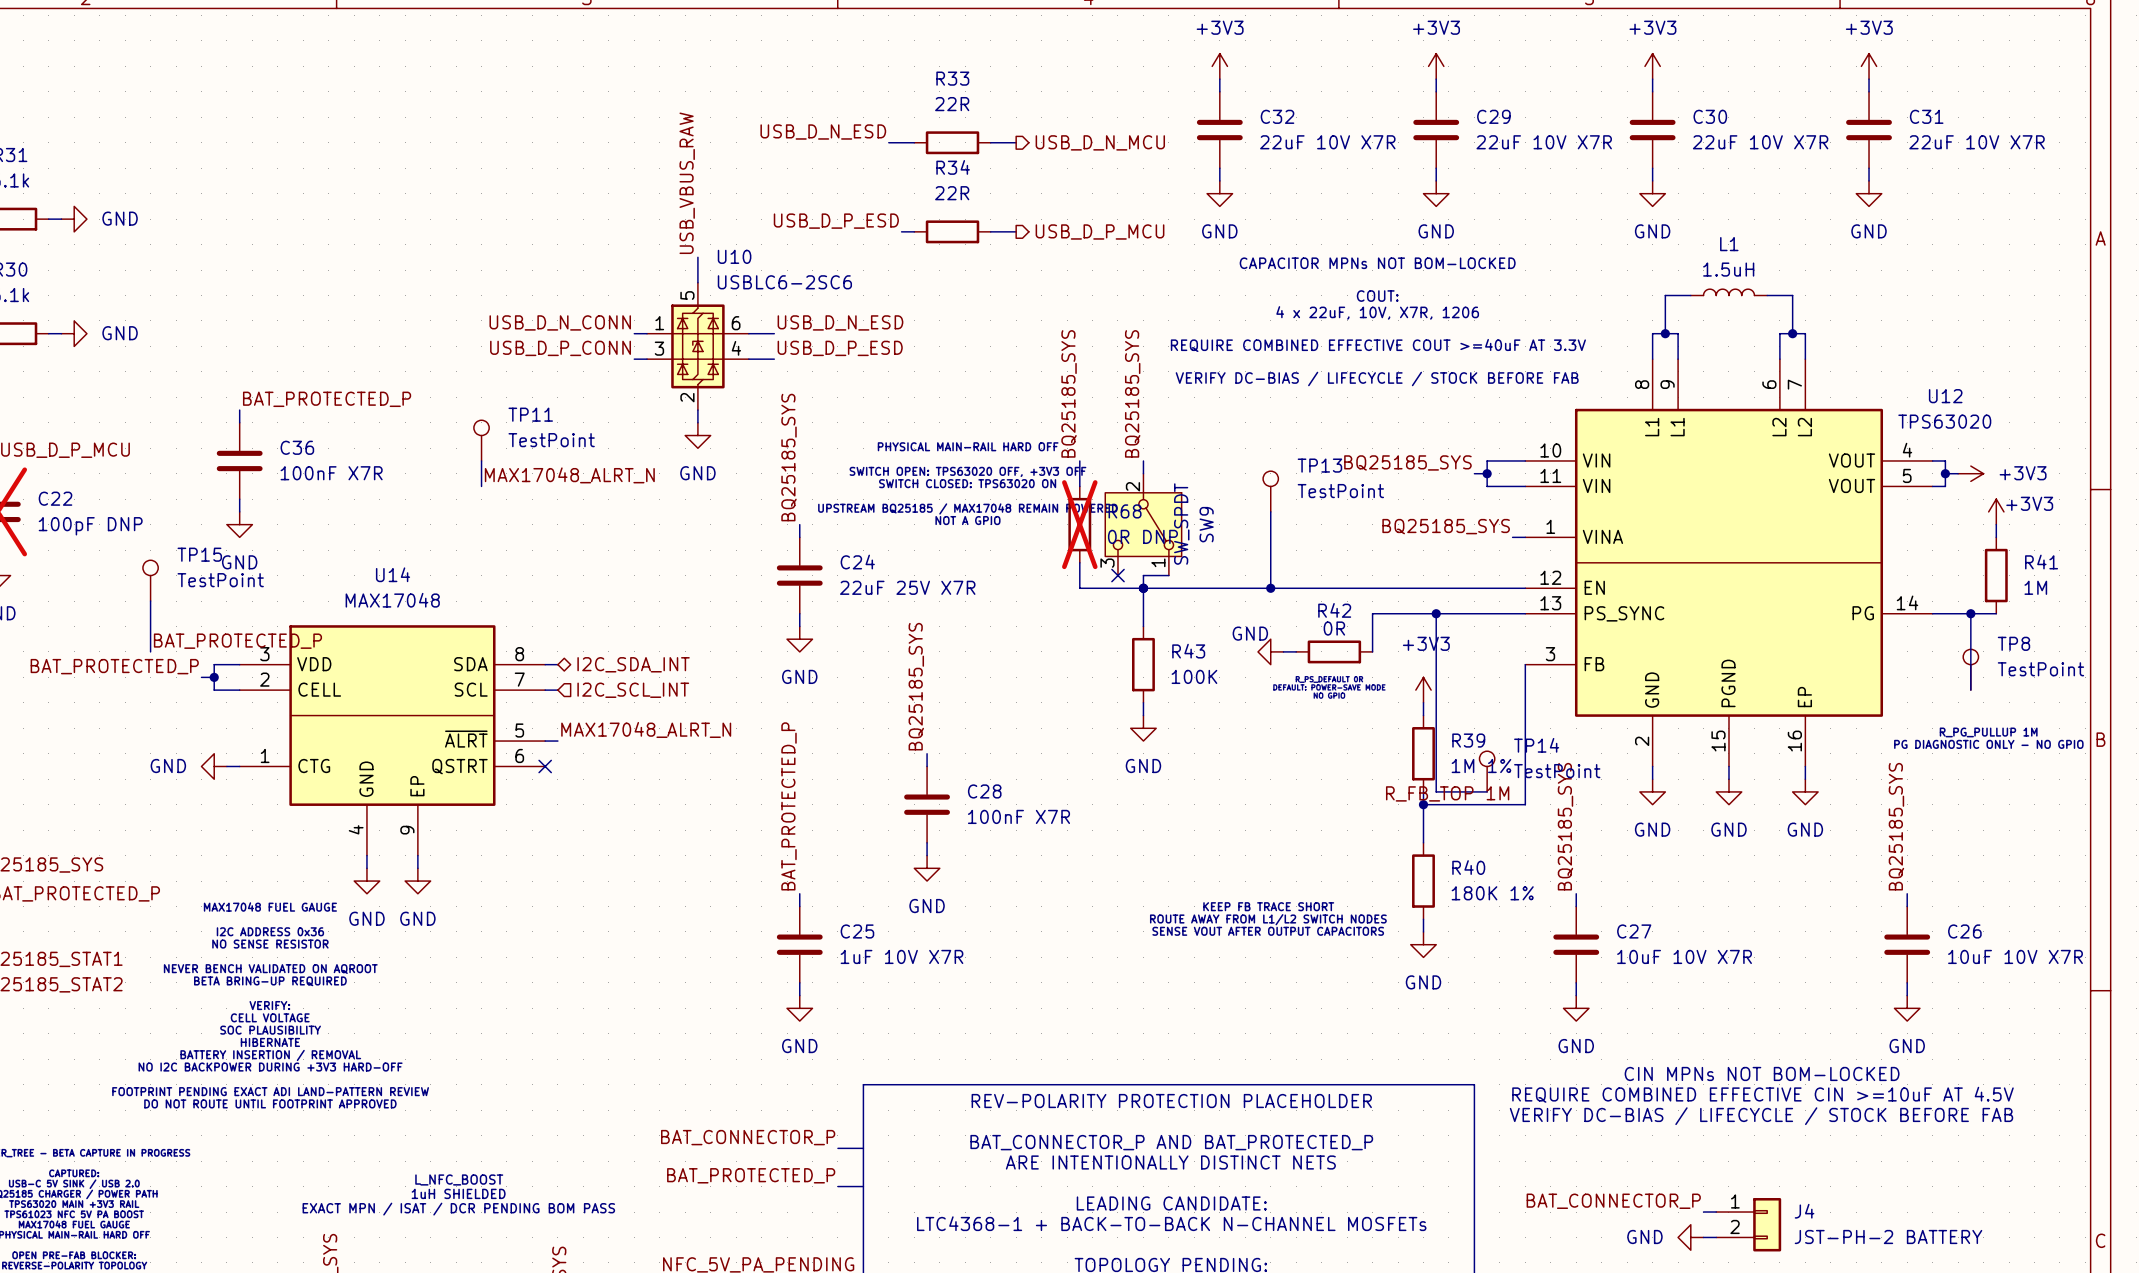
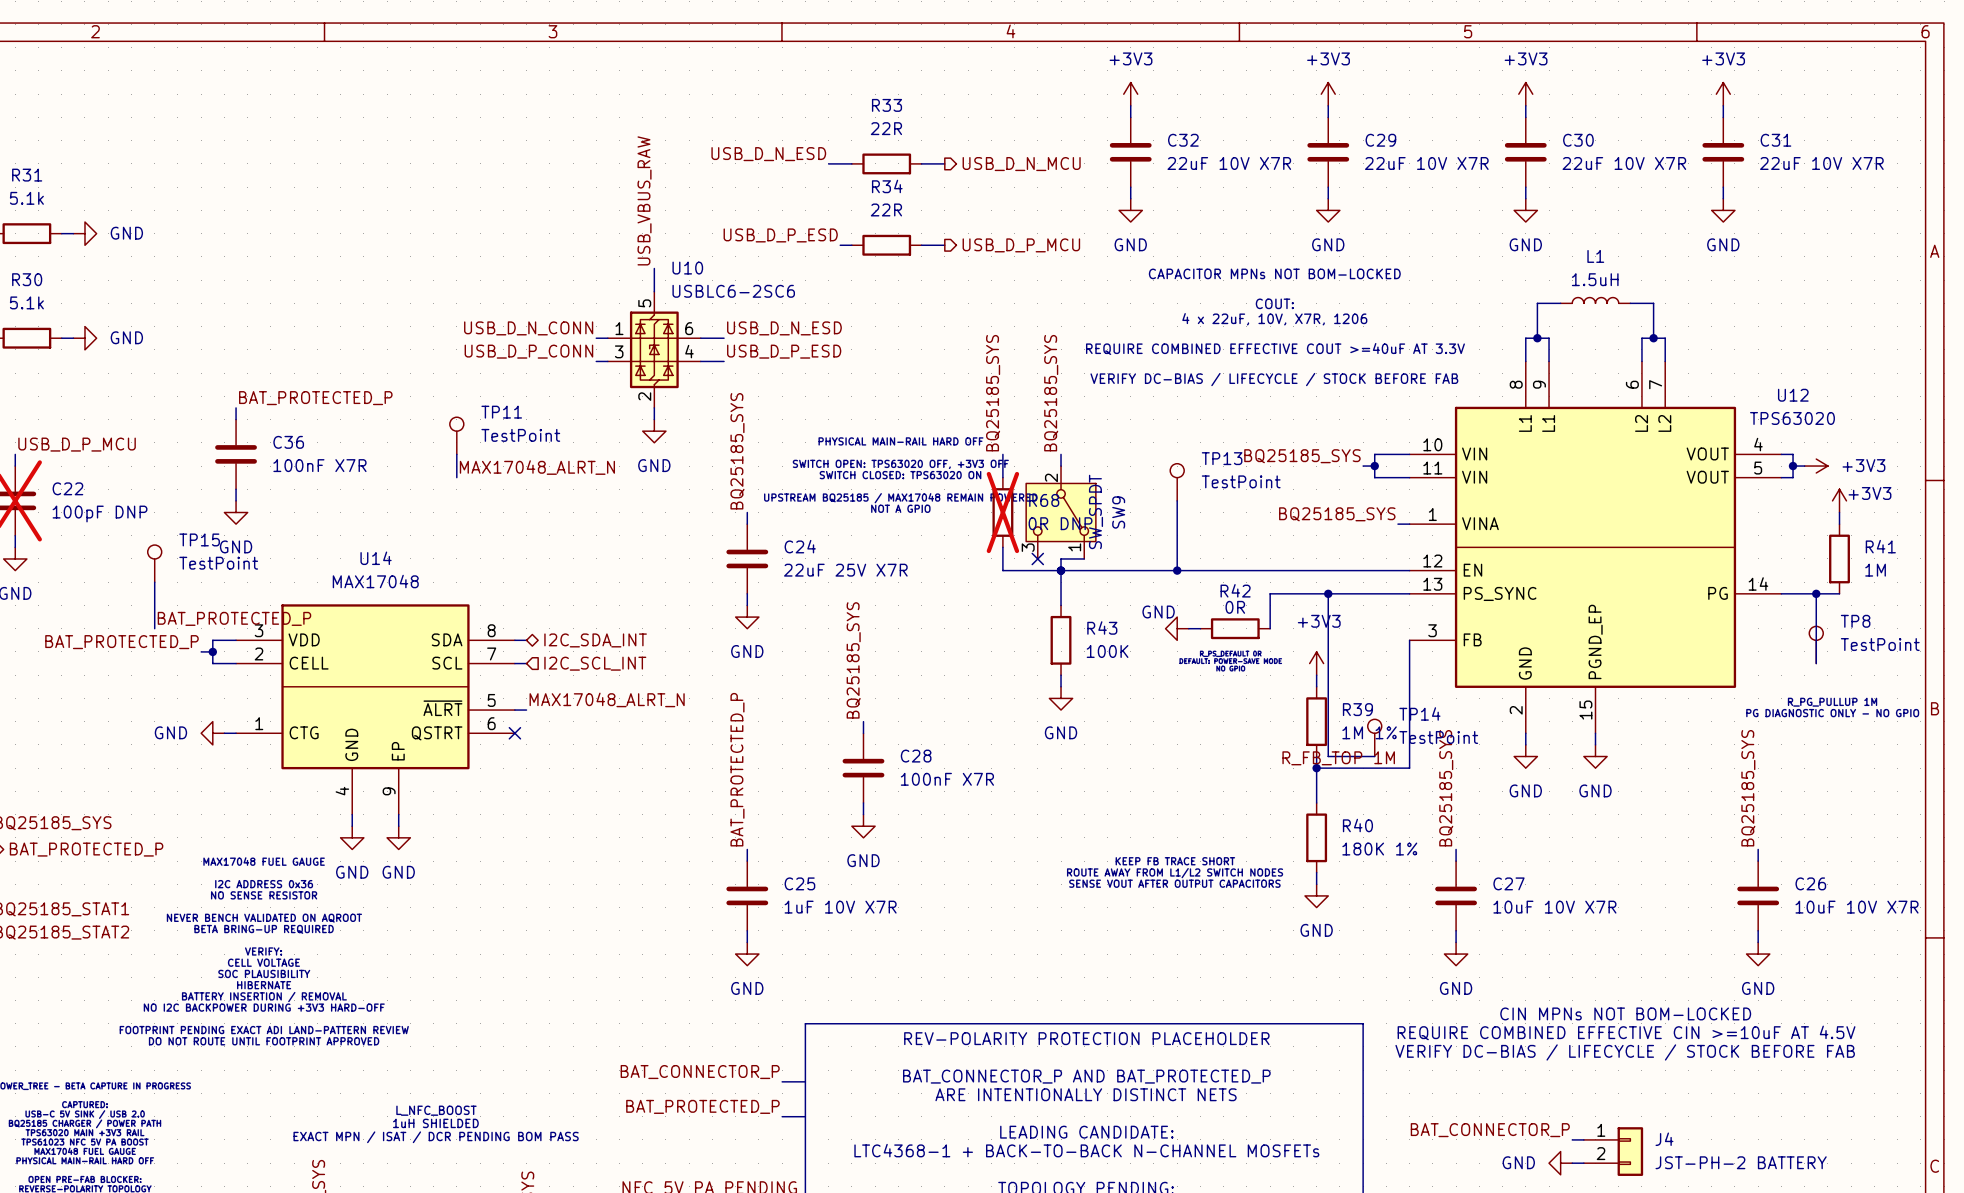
U12 symbol: [1525, 359, 1933, 767] -> [1409, 361, 1782, 734]
wire: (1805, 766) (1805, 779) -> none
power symbol: GND (1805, 791) -> none

